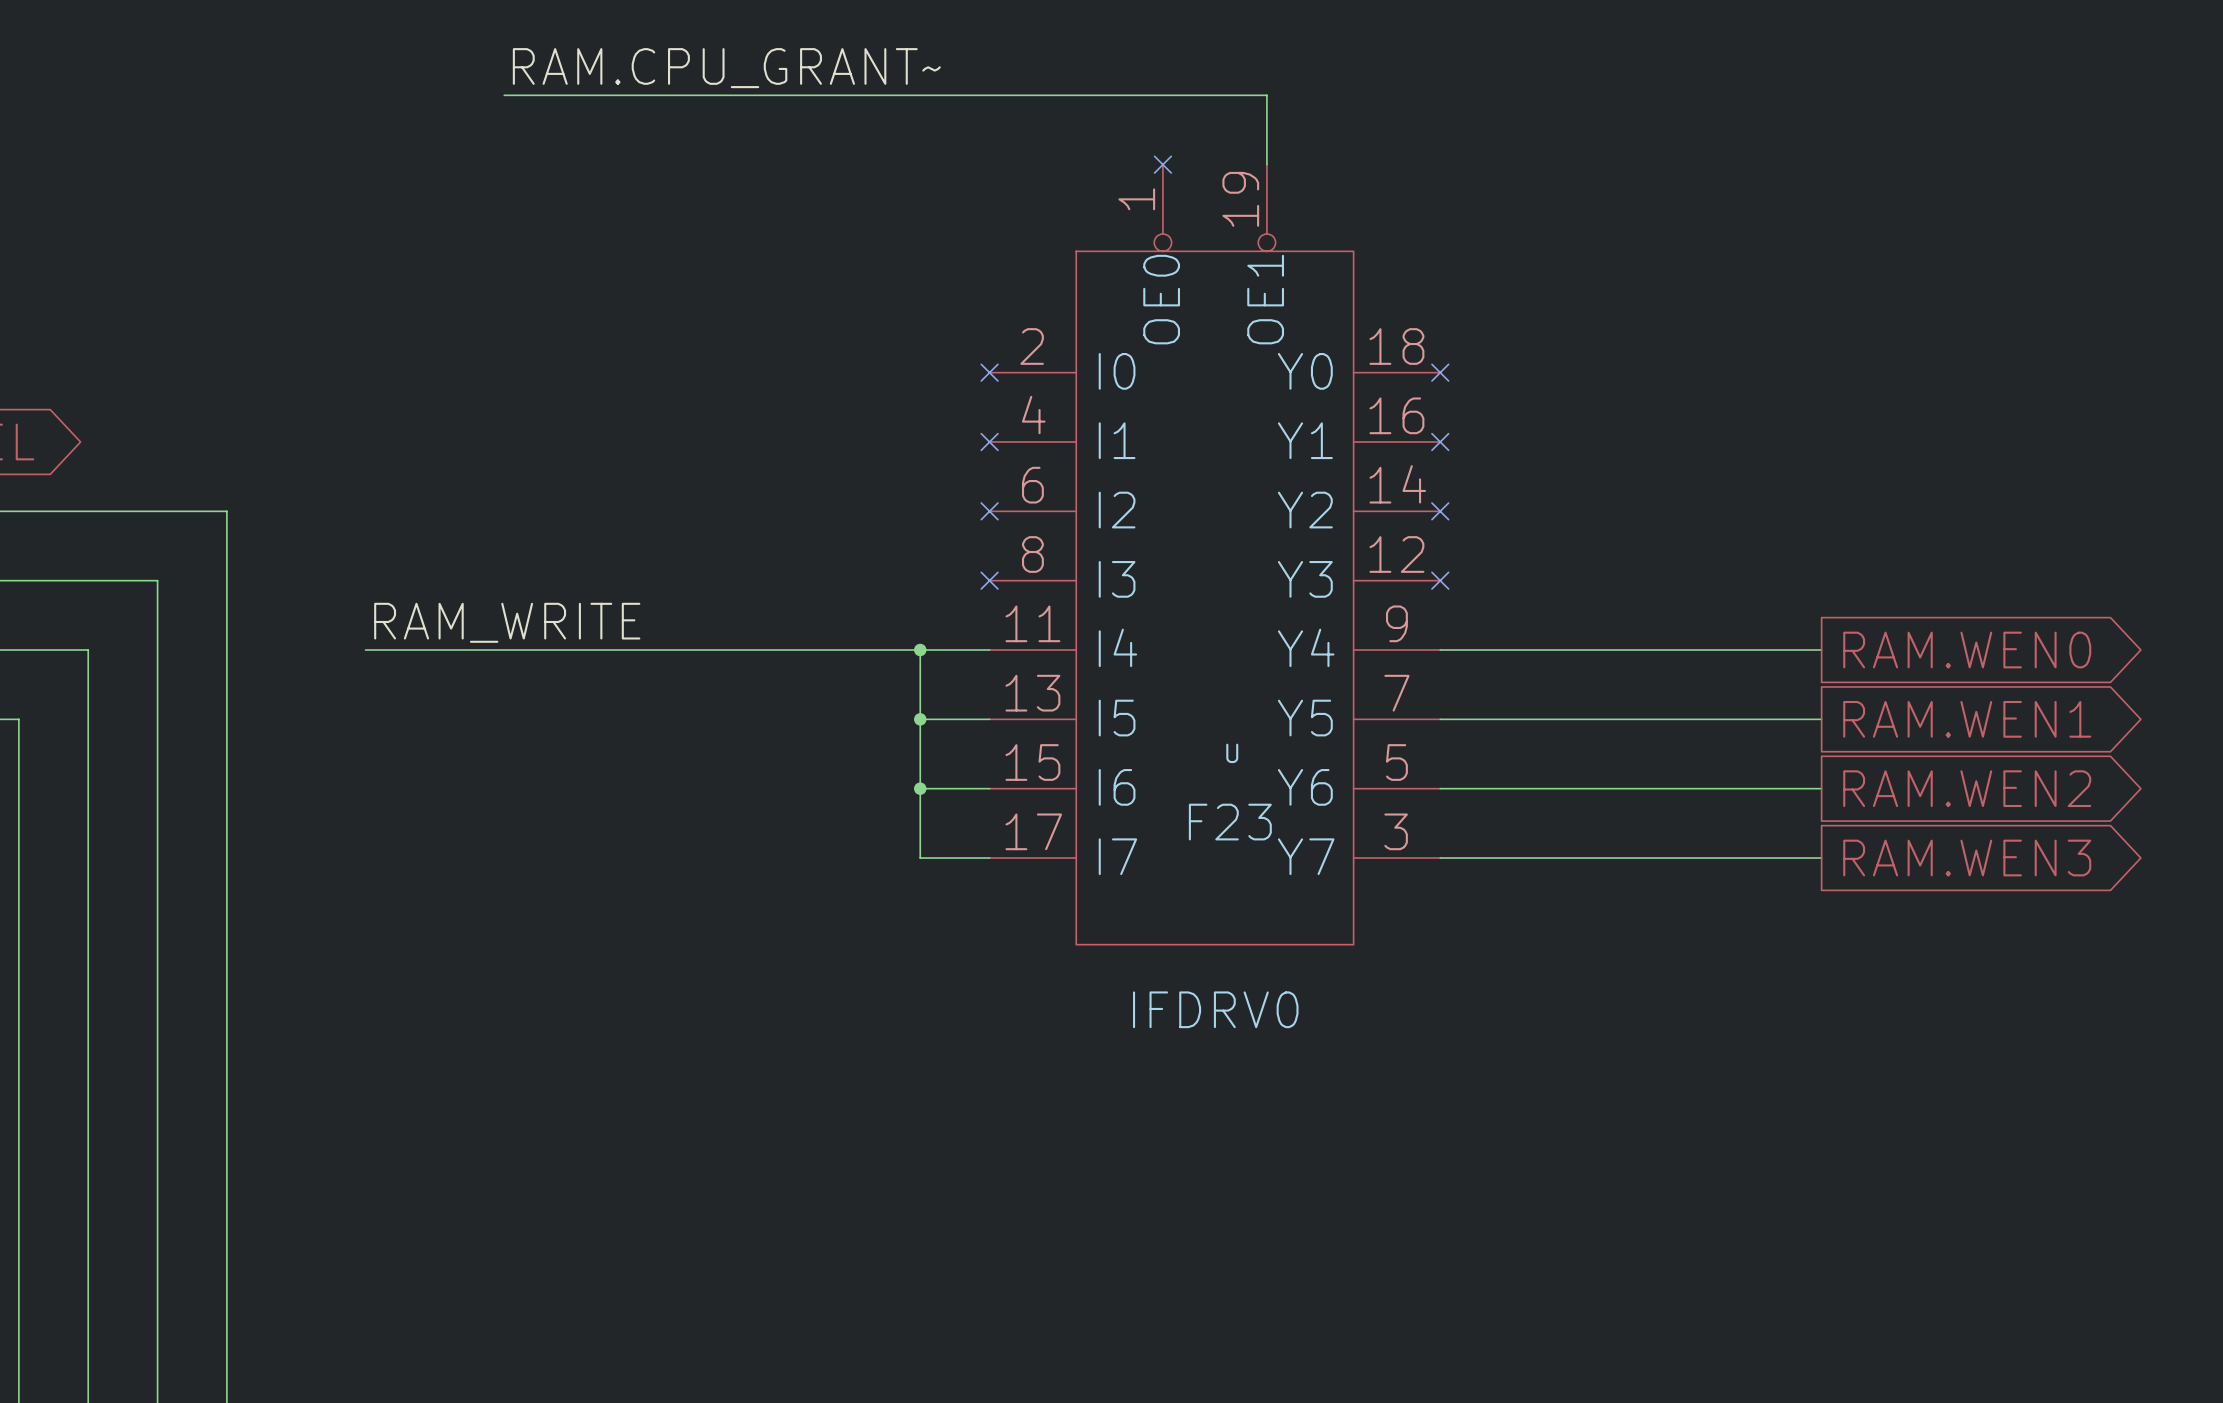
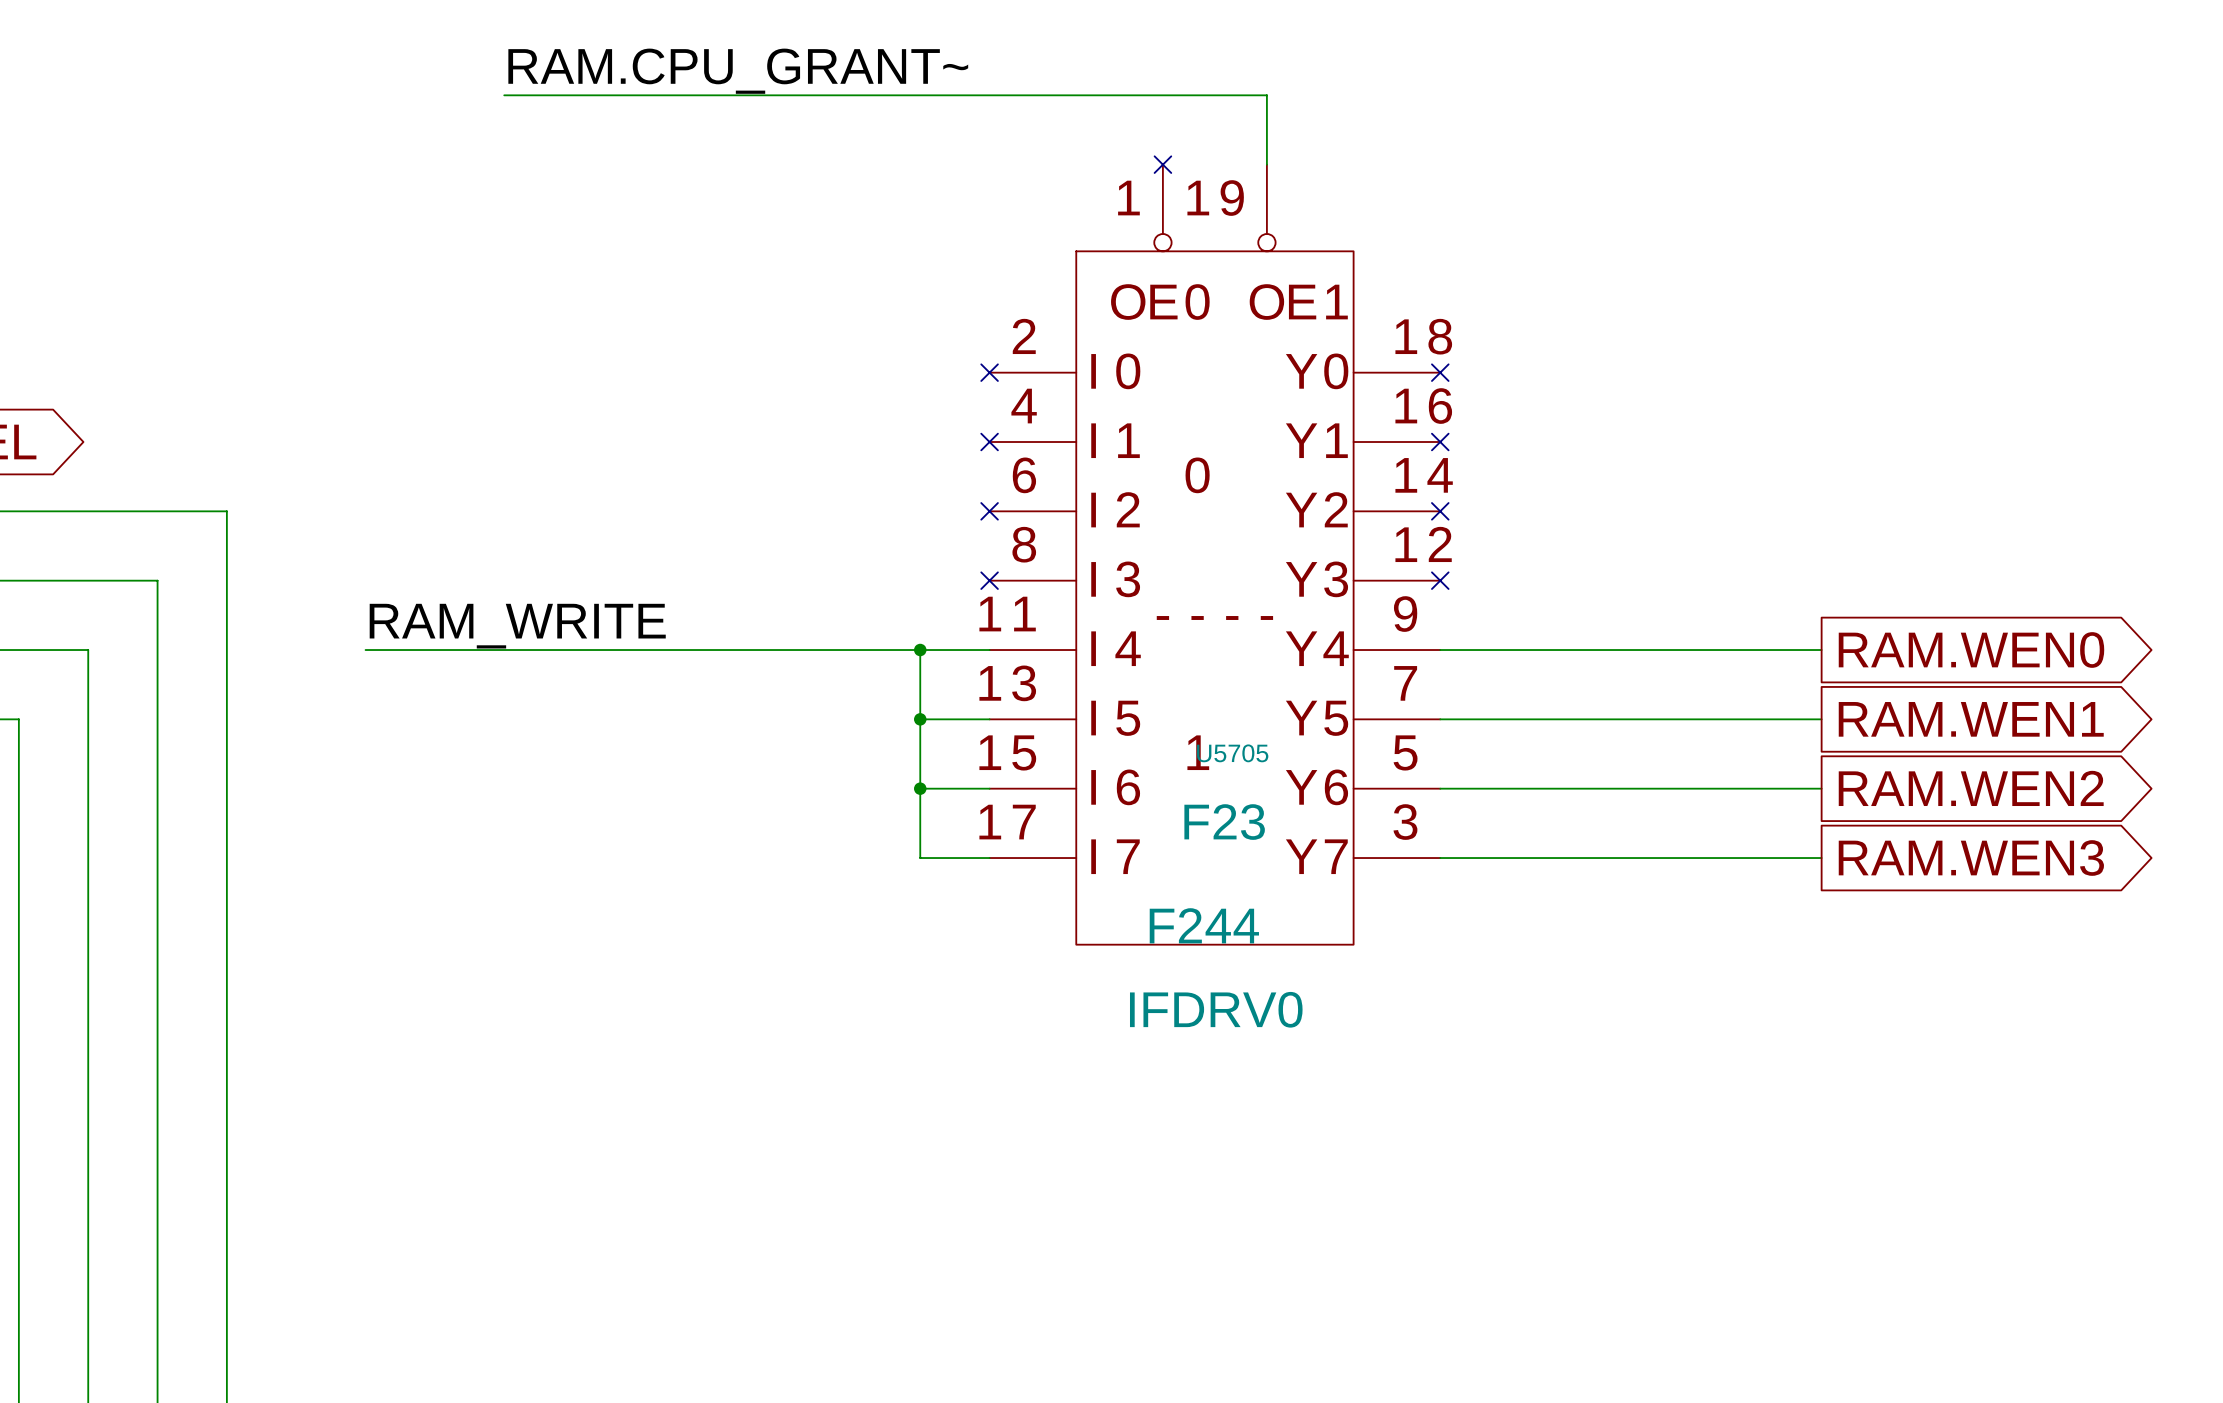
U symbol: [989, 164, 1441, 945] -> [989, 164, 1441, 945]
U name: U (1232, 753) -> U5705 (1232, 753)
U value: none -> F244 (1204, 925)

